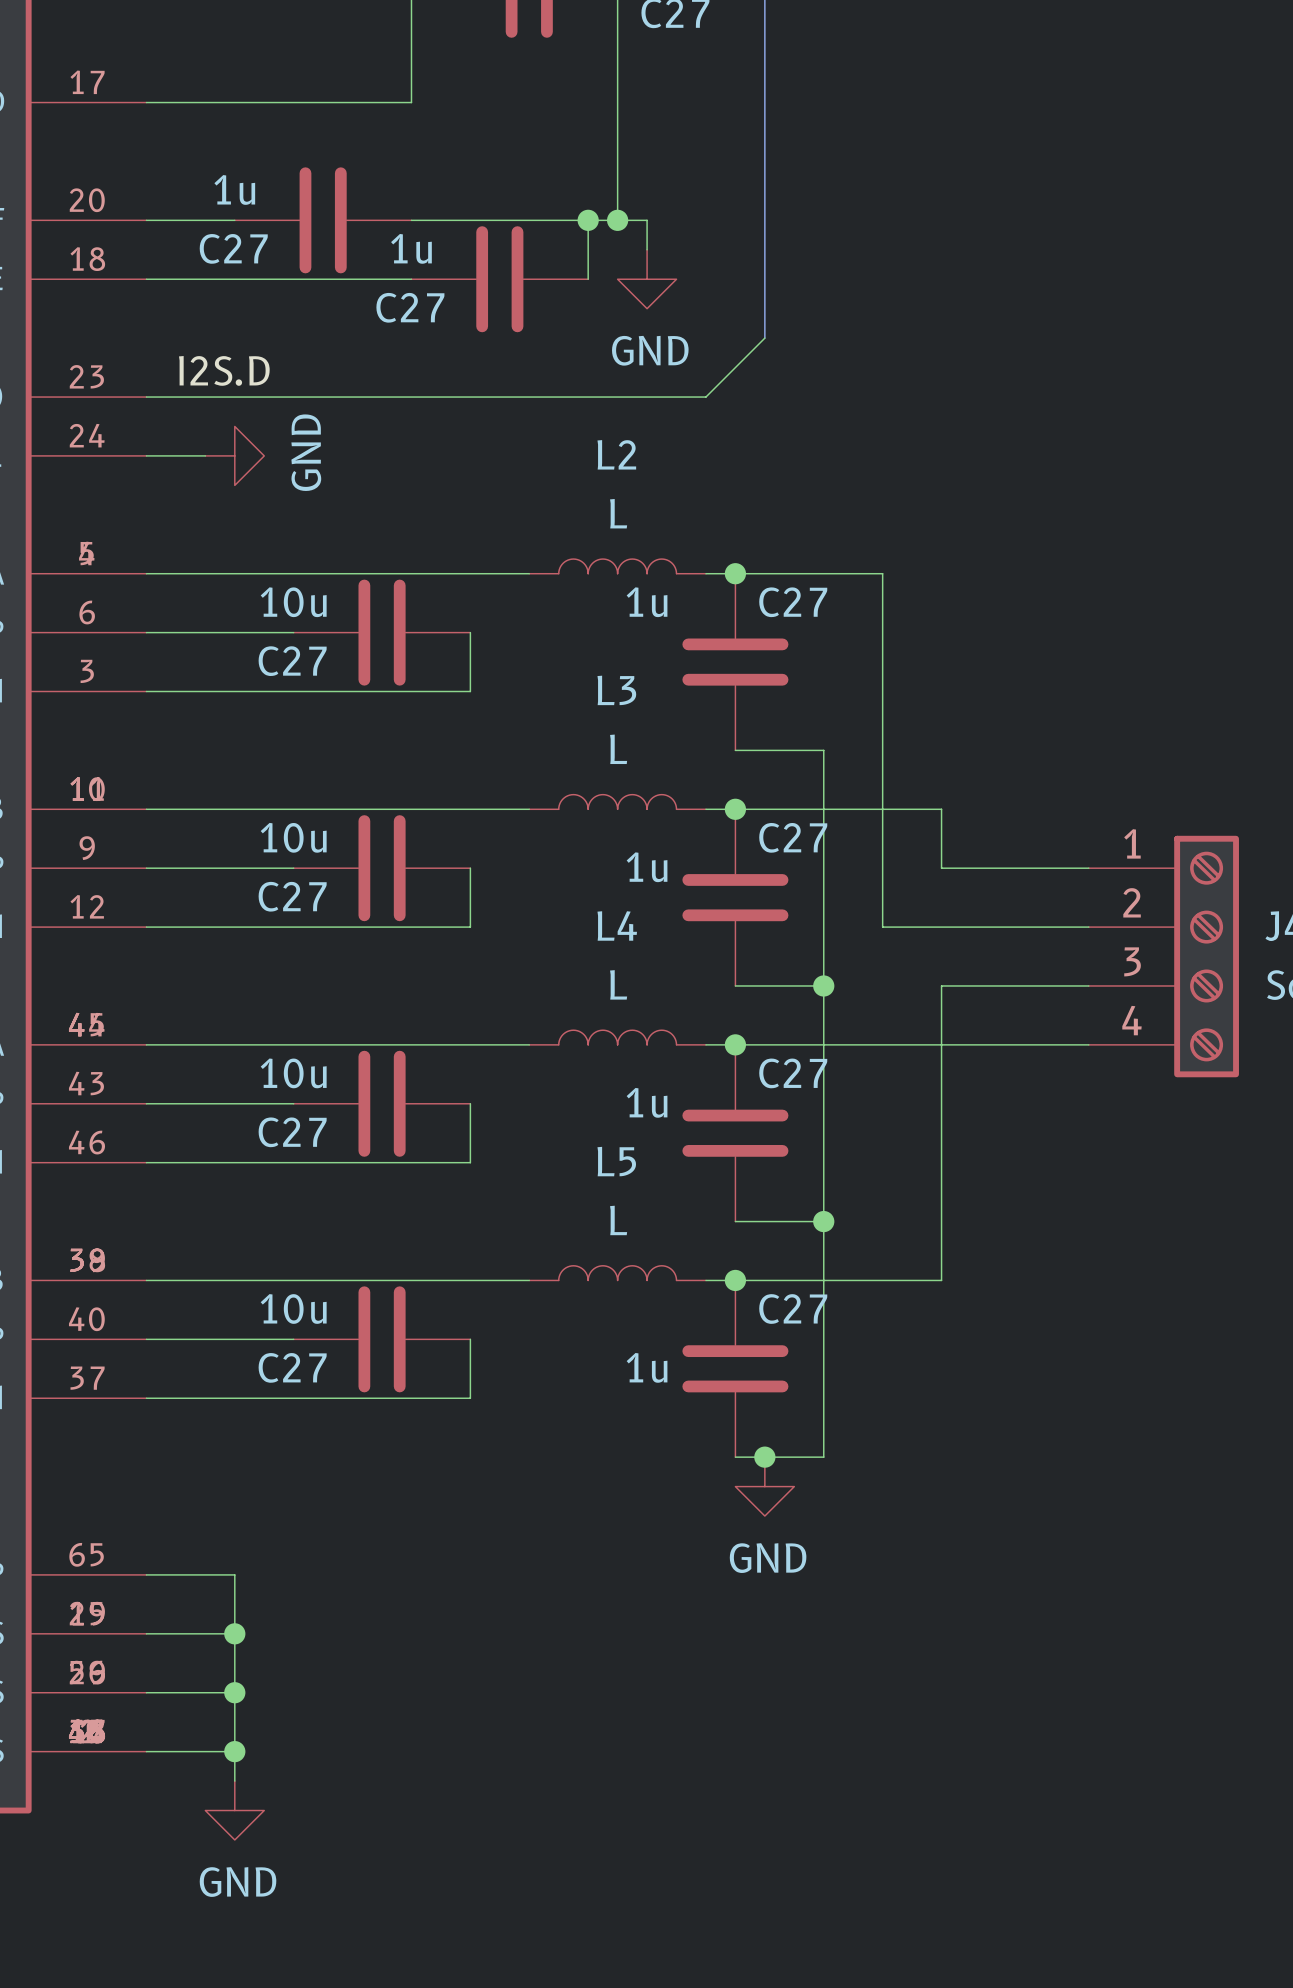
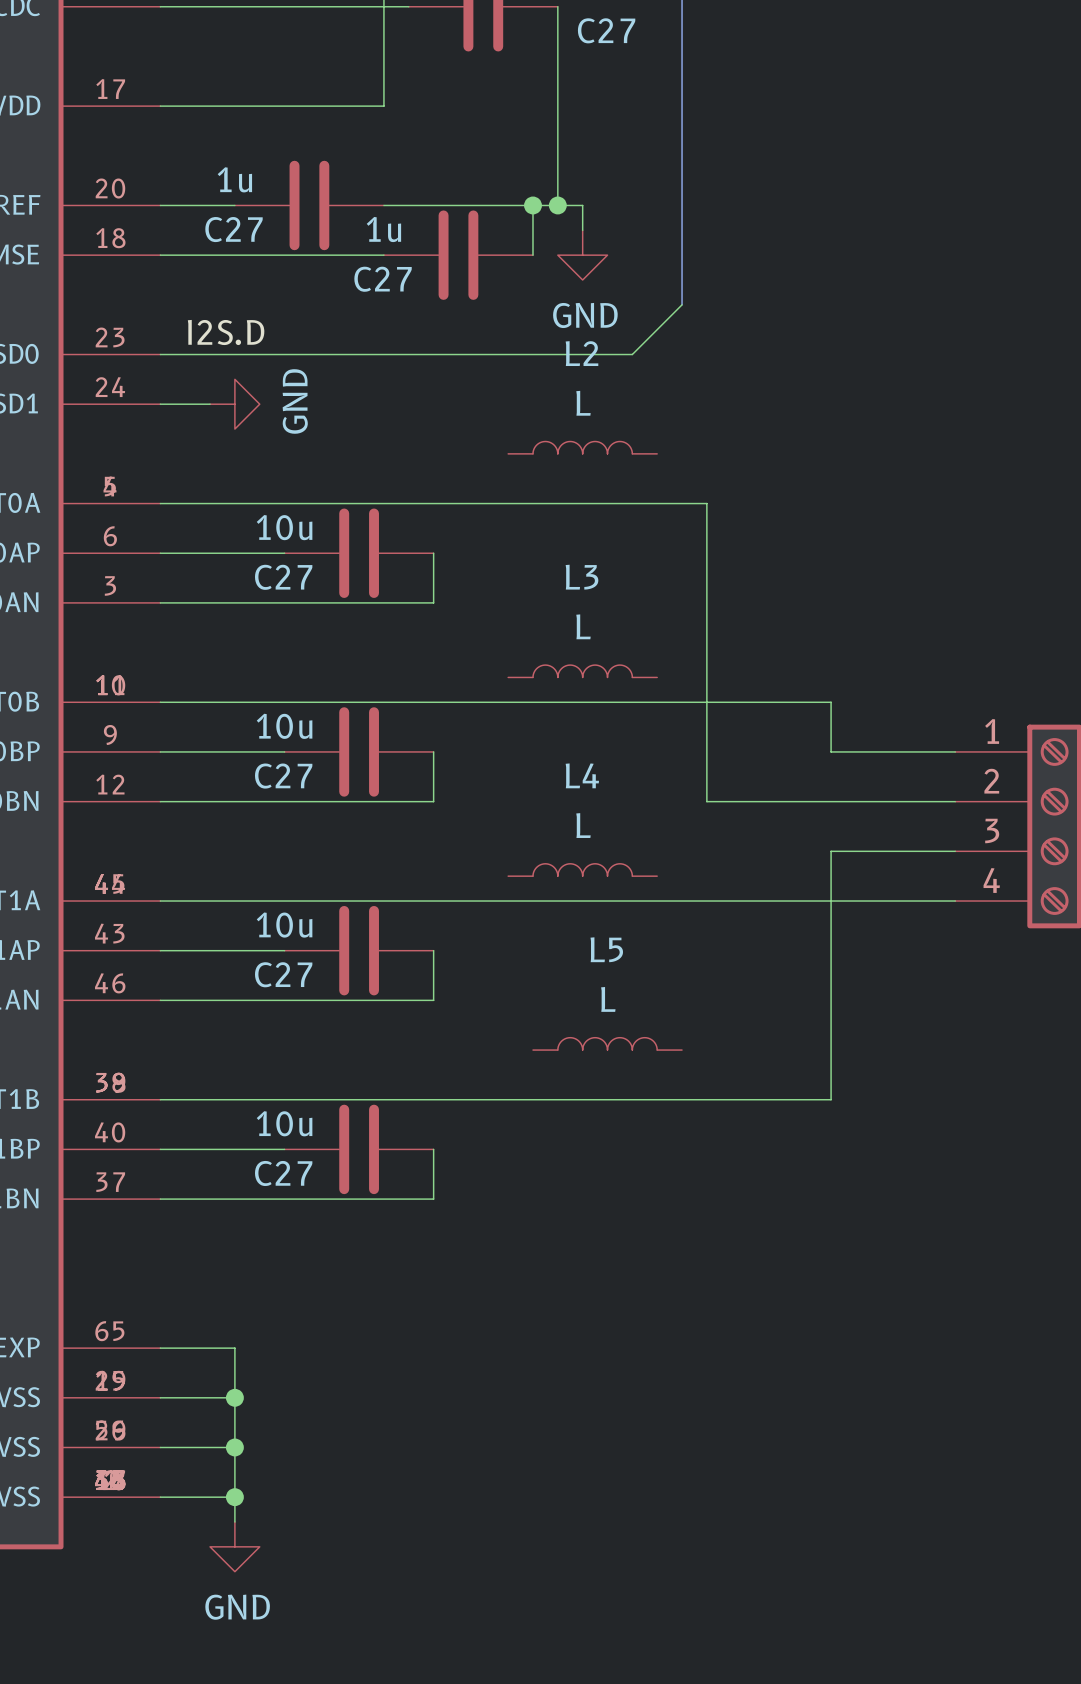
L2 position: (617, 566) -> (582, 447)
wire: none -> (483, 503) (632, 503)
junction: (735, 573) -> none
wire: (794, 573) (882, 573) (882, 927) -> (706, 503) (706, 801) (781, 801)
C27: 1u (735, 662) -> none
wire: (735, 750) (823, 750) (823, 1457) (735, 1457) -> none
L3 position: (617, 801) -> (582, 671)
wire: none -> (483, 702) (632, 702)
junction: (735, 809) -> none
C27: 1u (735, 897) -> none
wire: (735, 985) (823, 985) -> none
junction: (823, 985) -> none
L4 position: (617, 1037) -> (582, 869)
wire: none -> (483, 901) (632, 901)
junction: (735, 1044) -> none
C27: 1u (735, 1133) -> none
wire: (735, 1221) (823, 1221) -> none
junction: (823, 1221) -> none
L5 position: (617, 1273) -> (607, 1043)
wire: none -> (483, 1099) (632, 1099)
junction: (735, 1280) -> none
C27: 1u (735, 1368) -> none
junction: (764, 1457) -> none
power symbol: GND (764, 1486) -> none

